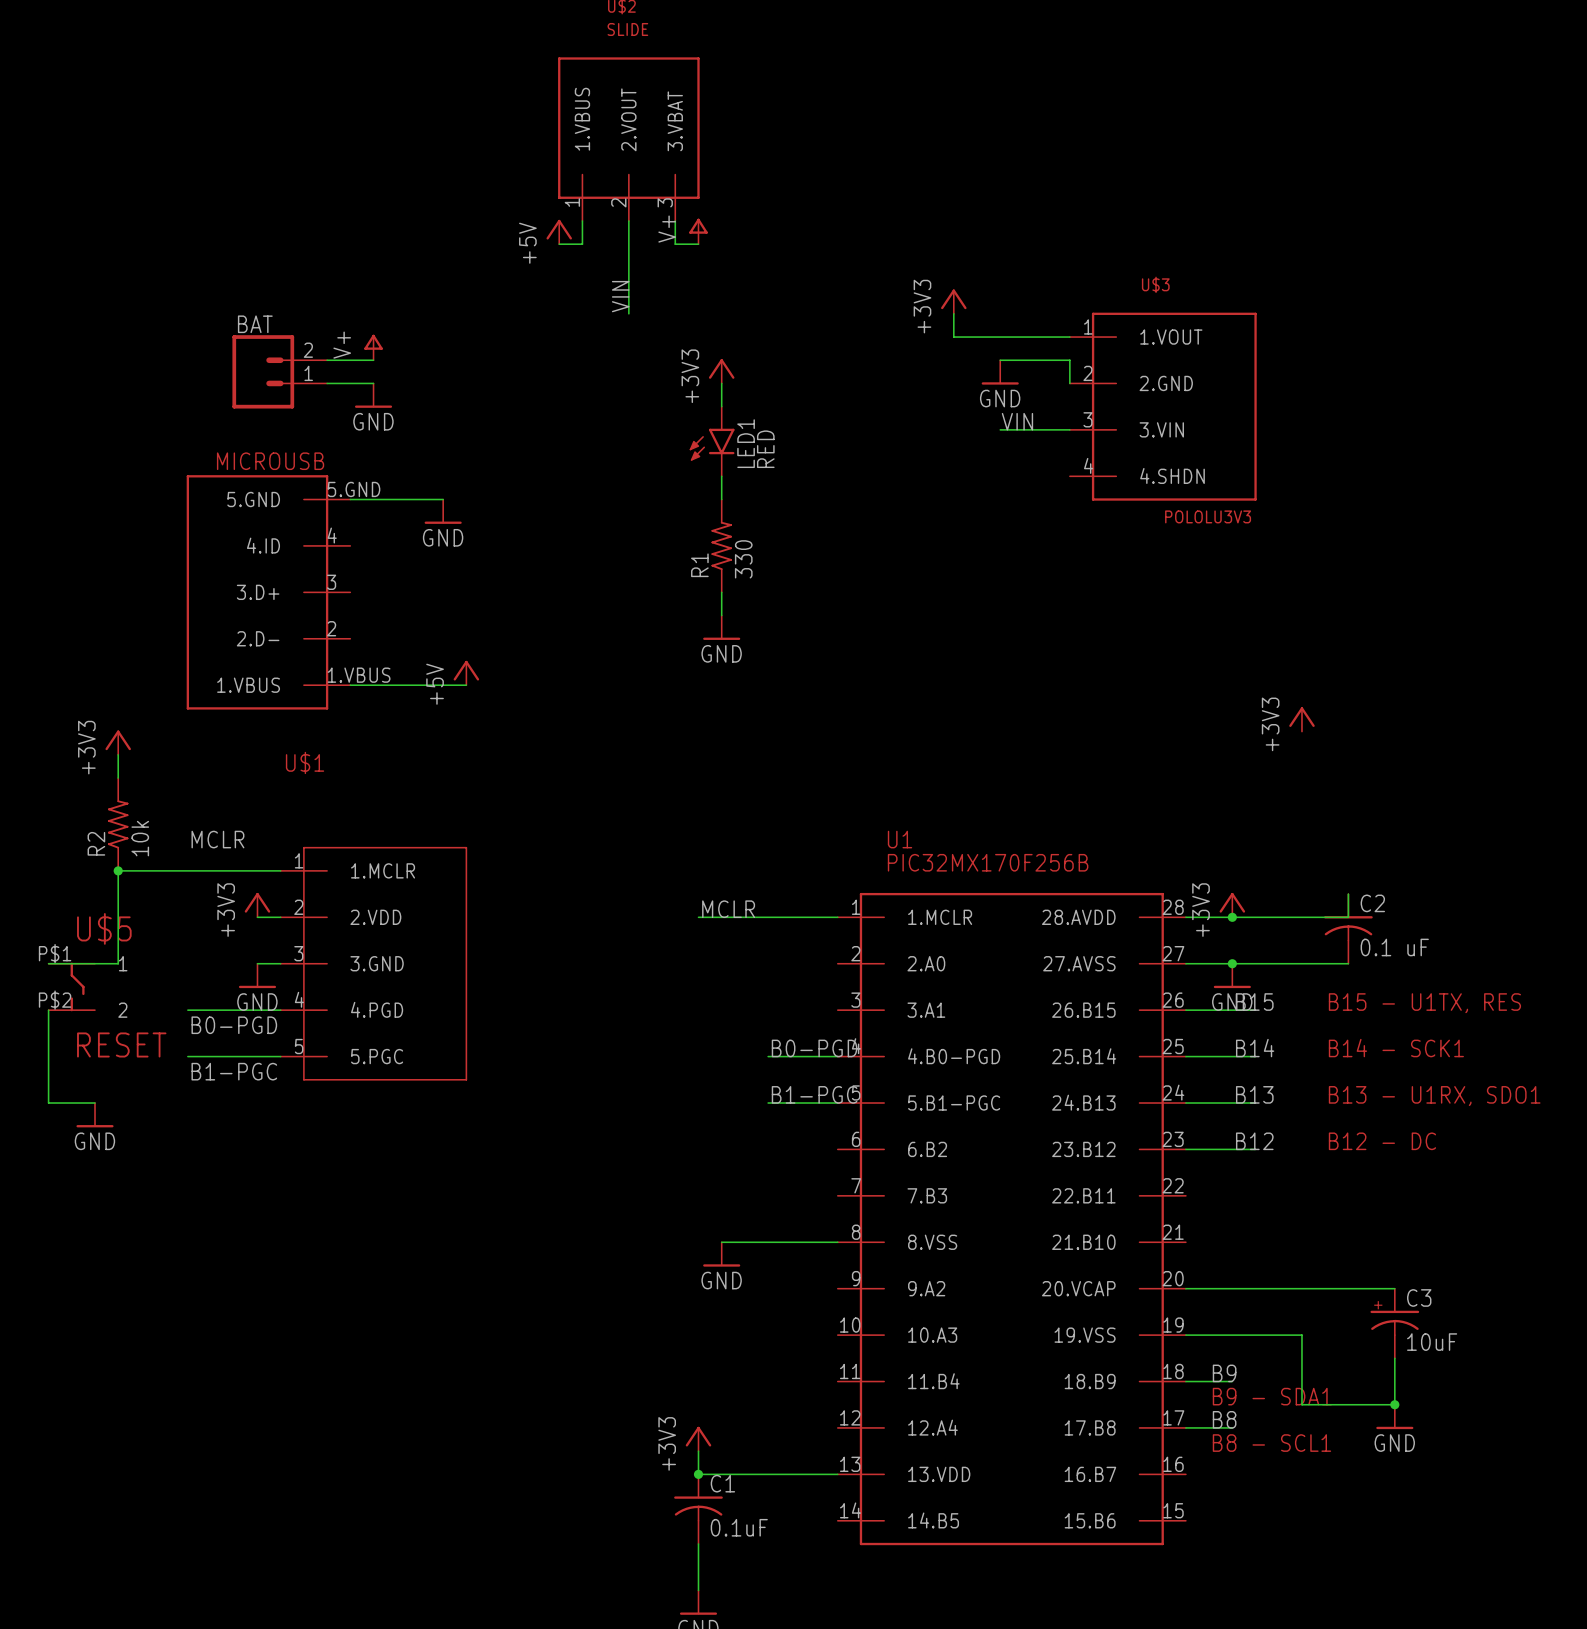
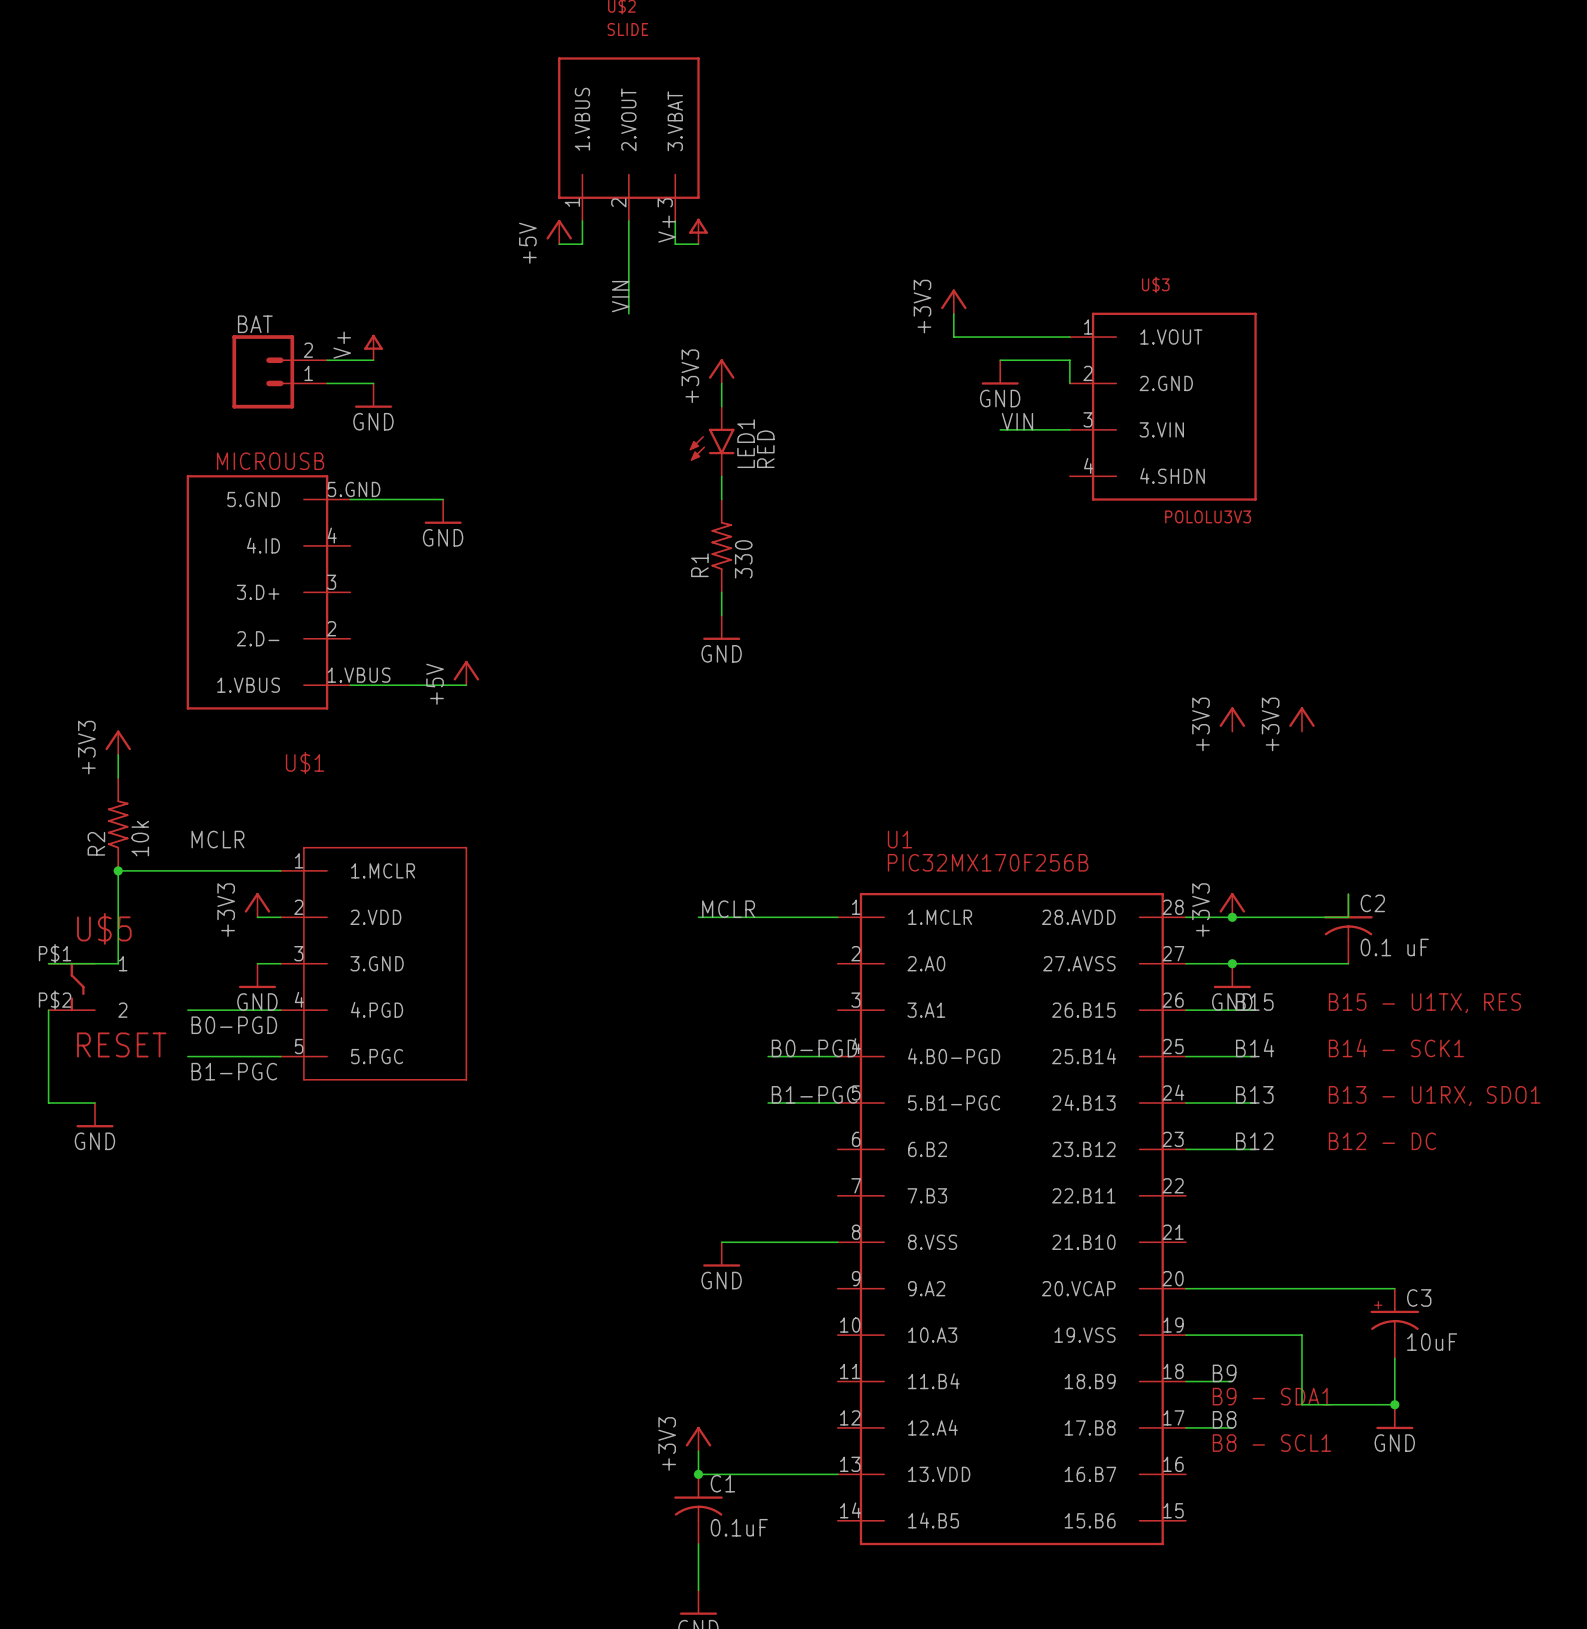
power symbol: none -> +3V3 (1232, 719)

